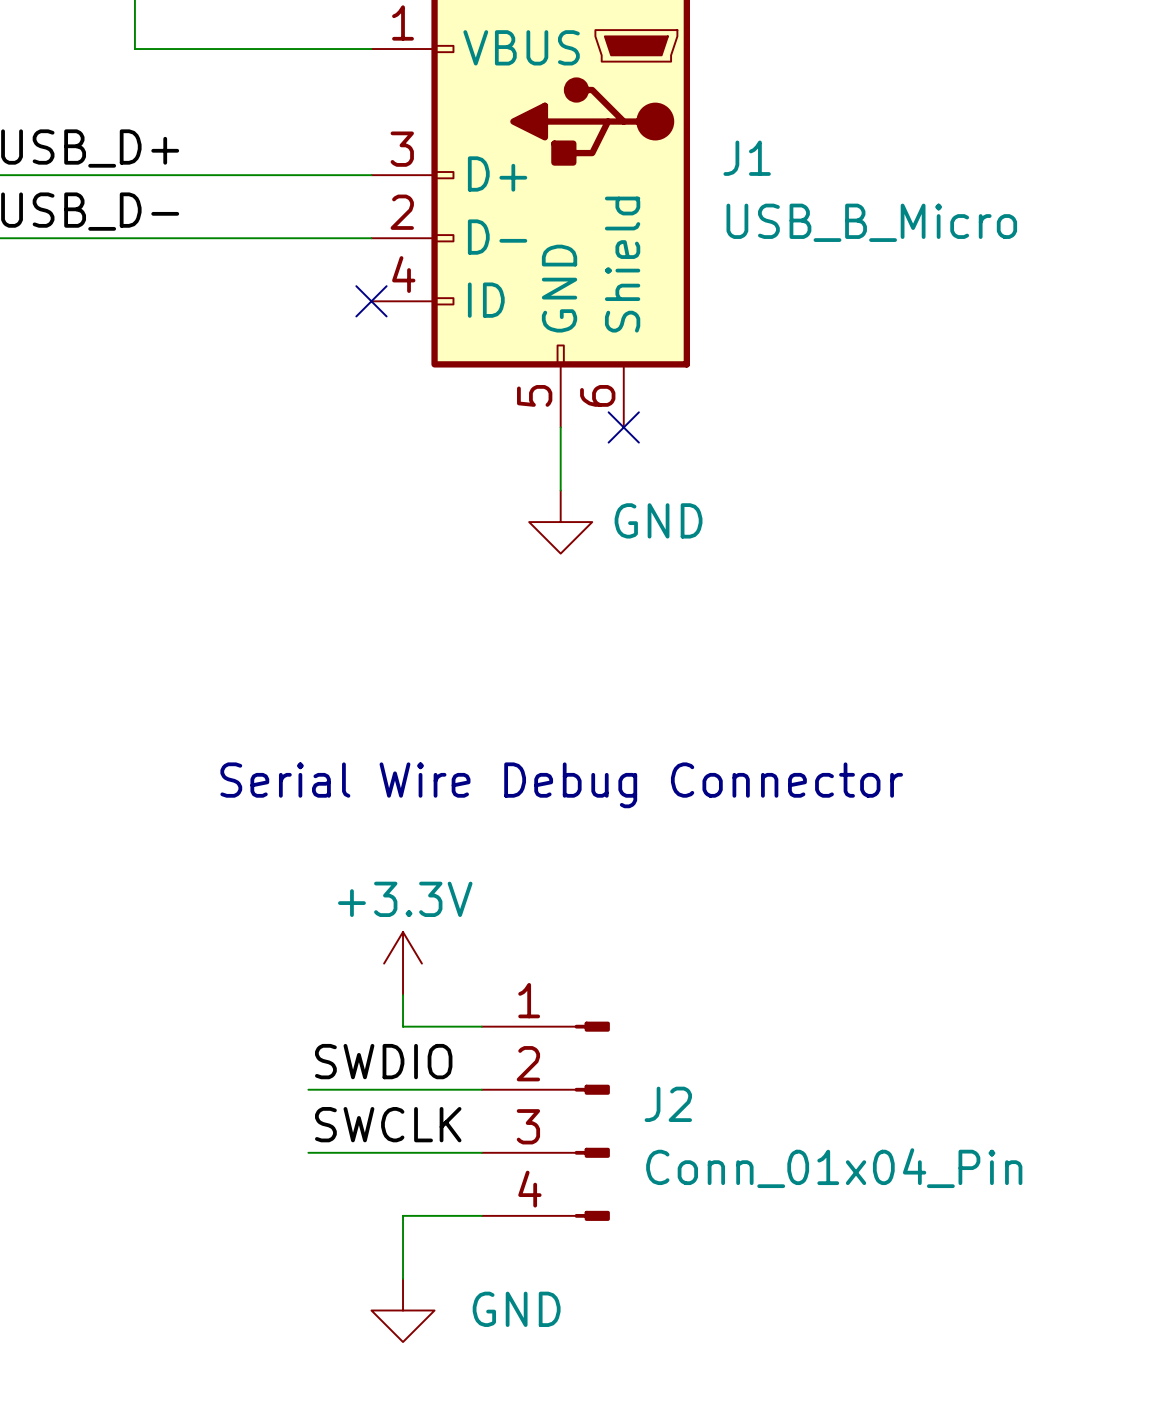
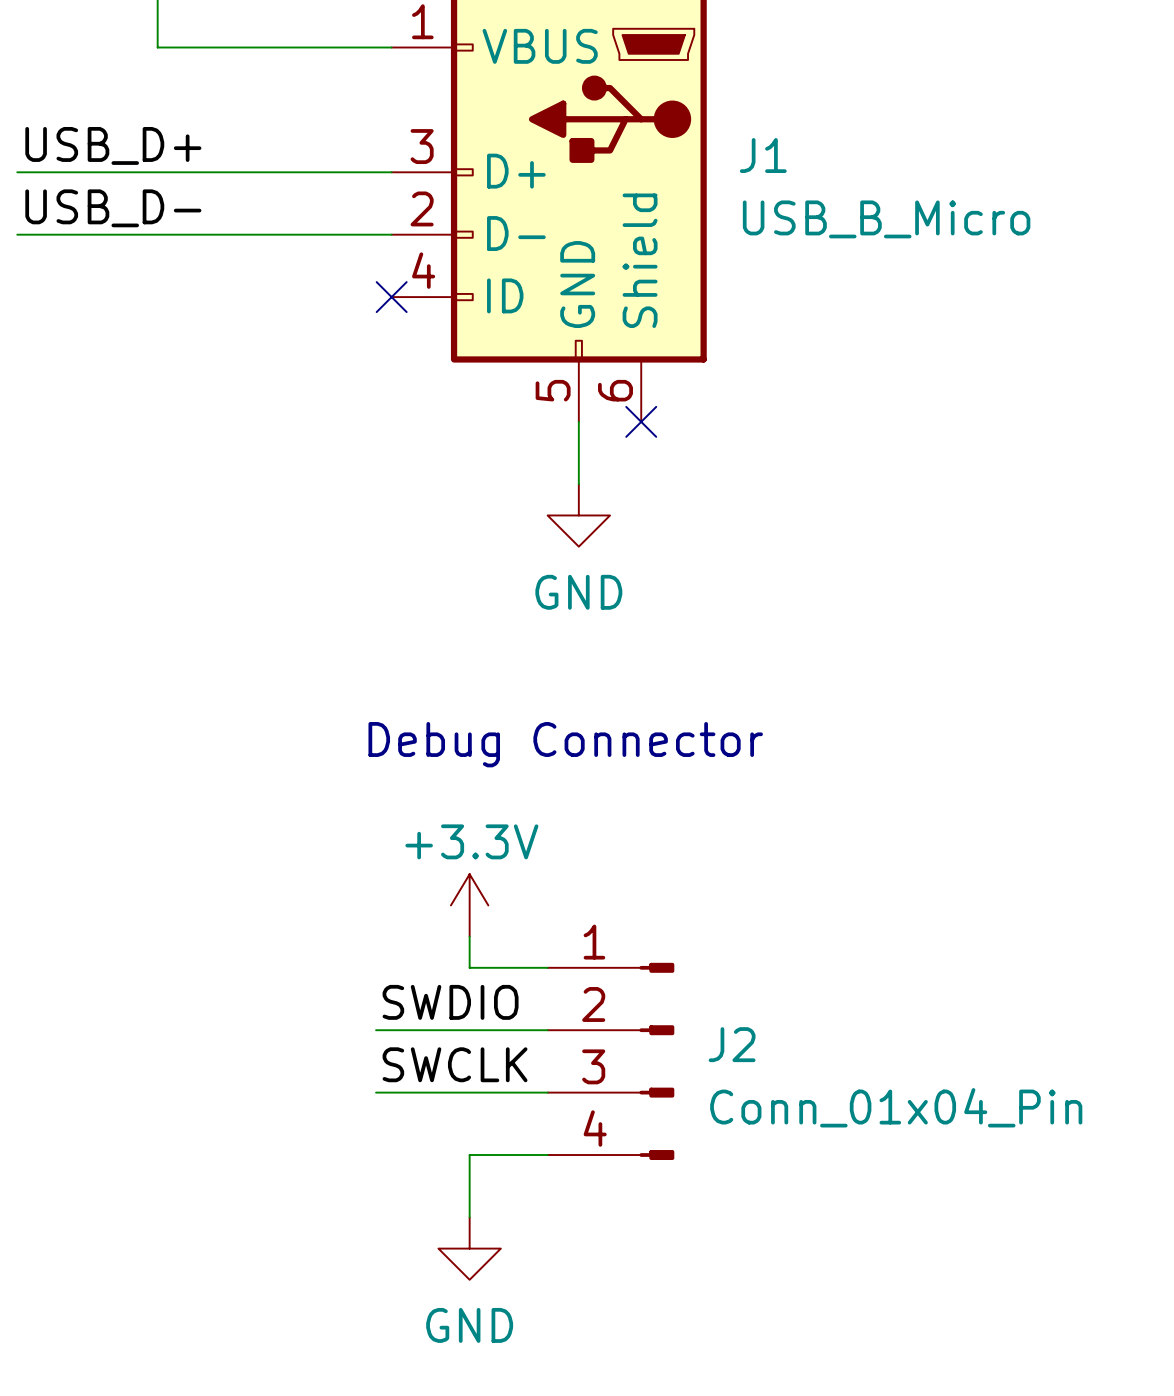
power symbol text position: GND (658, 520) -> GND (578, 592)
text: Serial Wire Debug Connector (561, 785) -> Debug Connector (565, 744)
power symbol position: +3.3V (403, 963) -> +3.3V (469, 905)
wire: (403, 995) (403, 1026) (481, 1026) -> (469, 936) (469, 967) (547, 967)
label position: SWDIO (383, 1061) -> SWDIO (450, 1002)
wire: (308, 1089) (481, 1089) -> (376, 1030) (547, 1030)
J2 position: (545, 1121) -> (610, 1061)
label position: SWCLK (388, 1124) -> SWCLK (455, 1064)
wire: (308, 1152) (481, 1152) -> (376, 1092) (547, 1092)
wire: (481, 1215) (403, 1215) (403, 1278) -> (547, 1155) (469, 1155) (469, 1217)
power symbol text position: GND (516, 1309) -> GND (469, 1325)
power symbol position: GND (403, 1310) -> GND (469, 1248)

